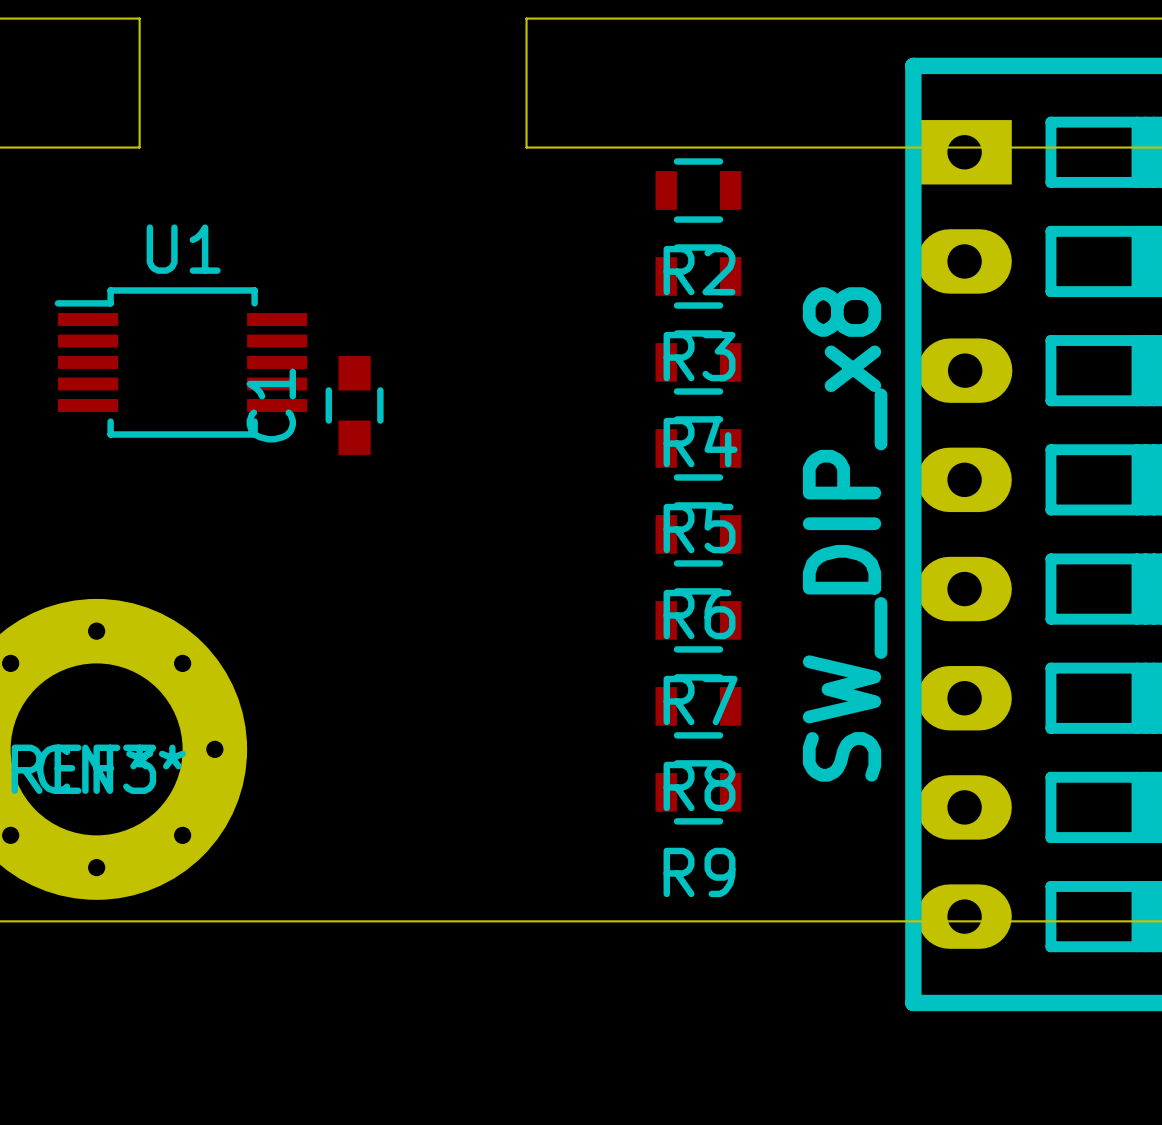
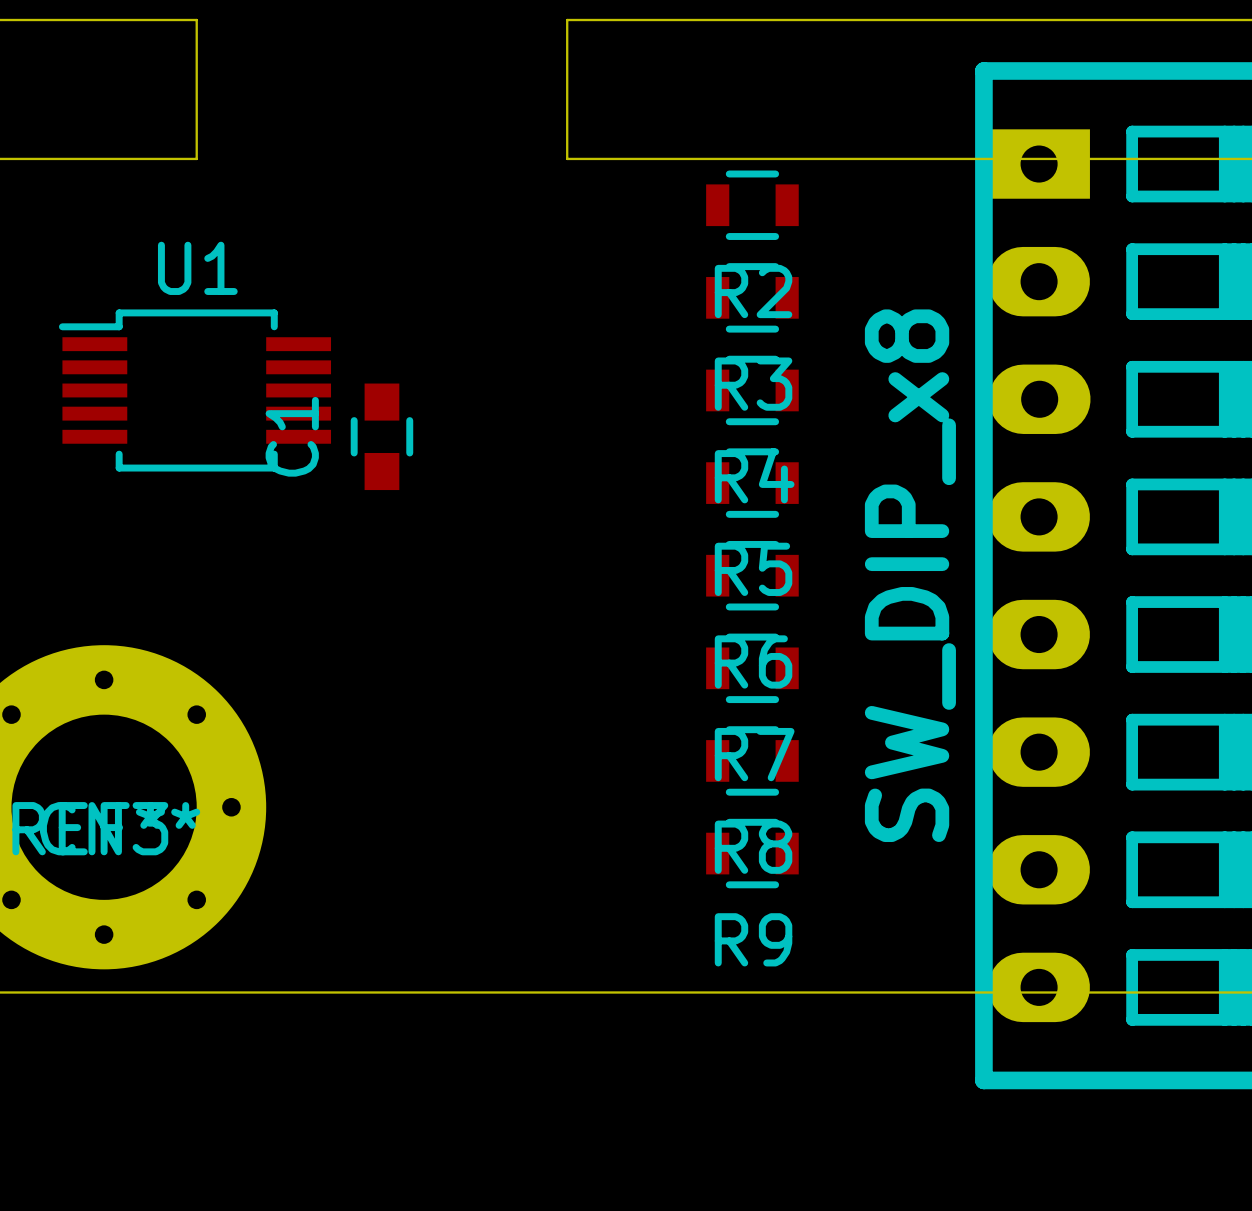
board edge: (139, 18) (139, 147) -> (150, 20) (196, 20) (196, 158) (150, 158)

